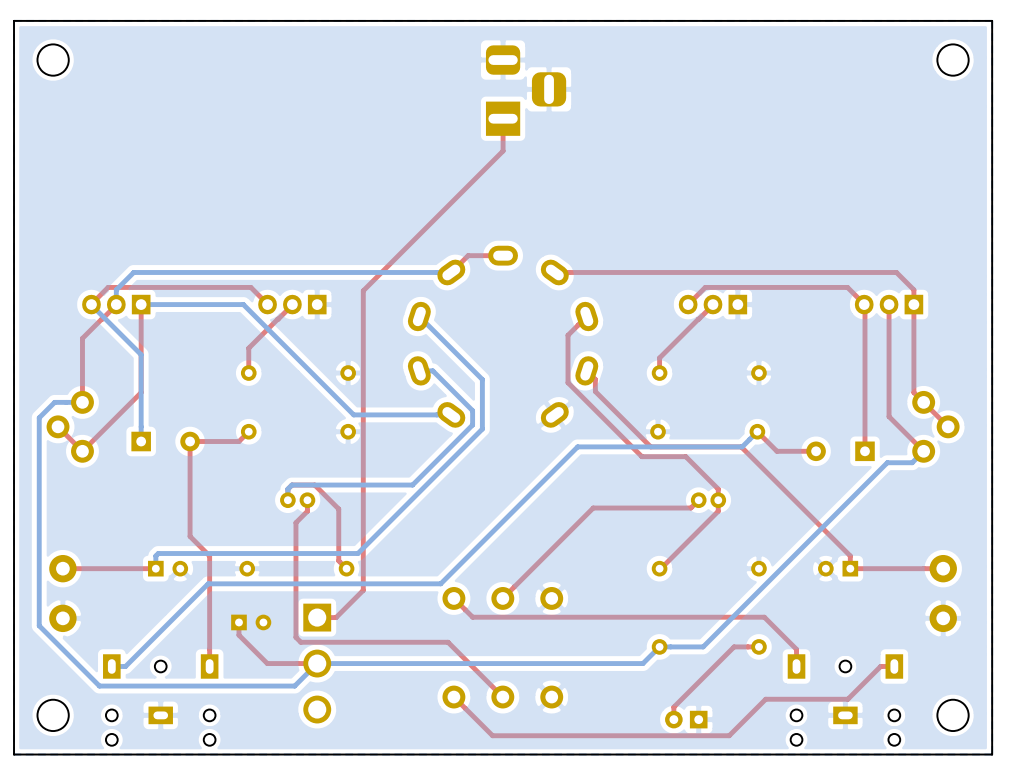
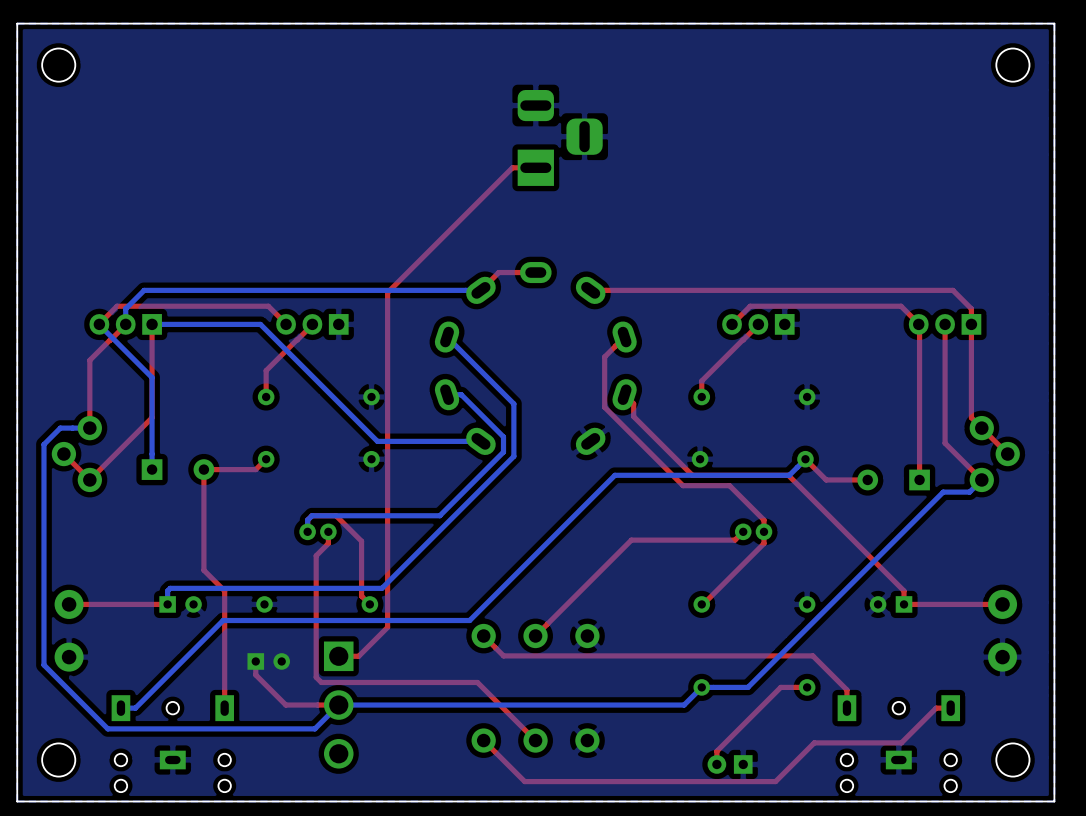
part position: (526, 90) -> (560, 137)
top track: (503, 118) (503, 151) (363, 290) -> (535, 167) (512, 167) (387, 292) (387, 309)

